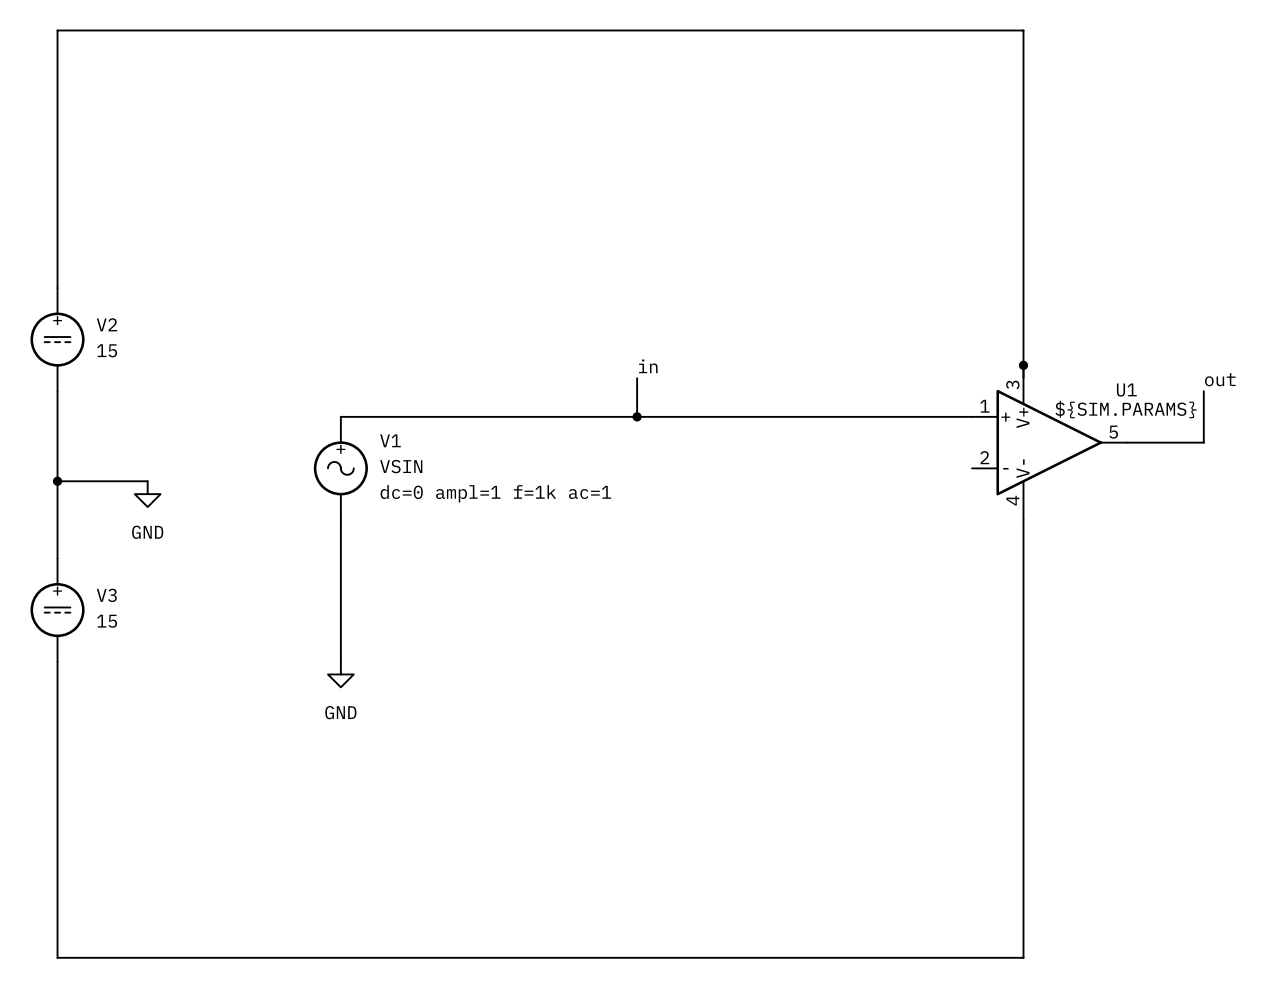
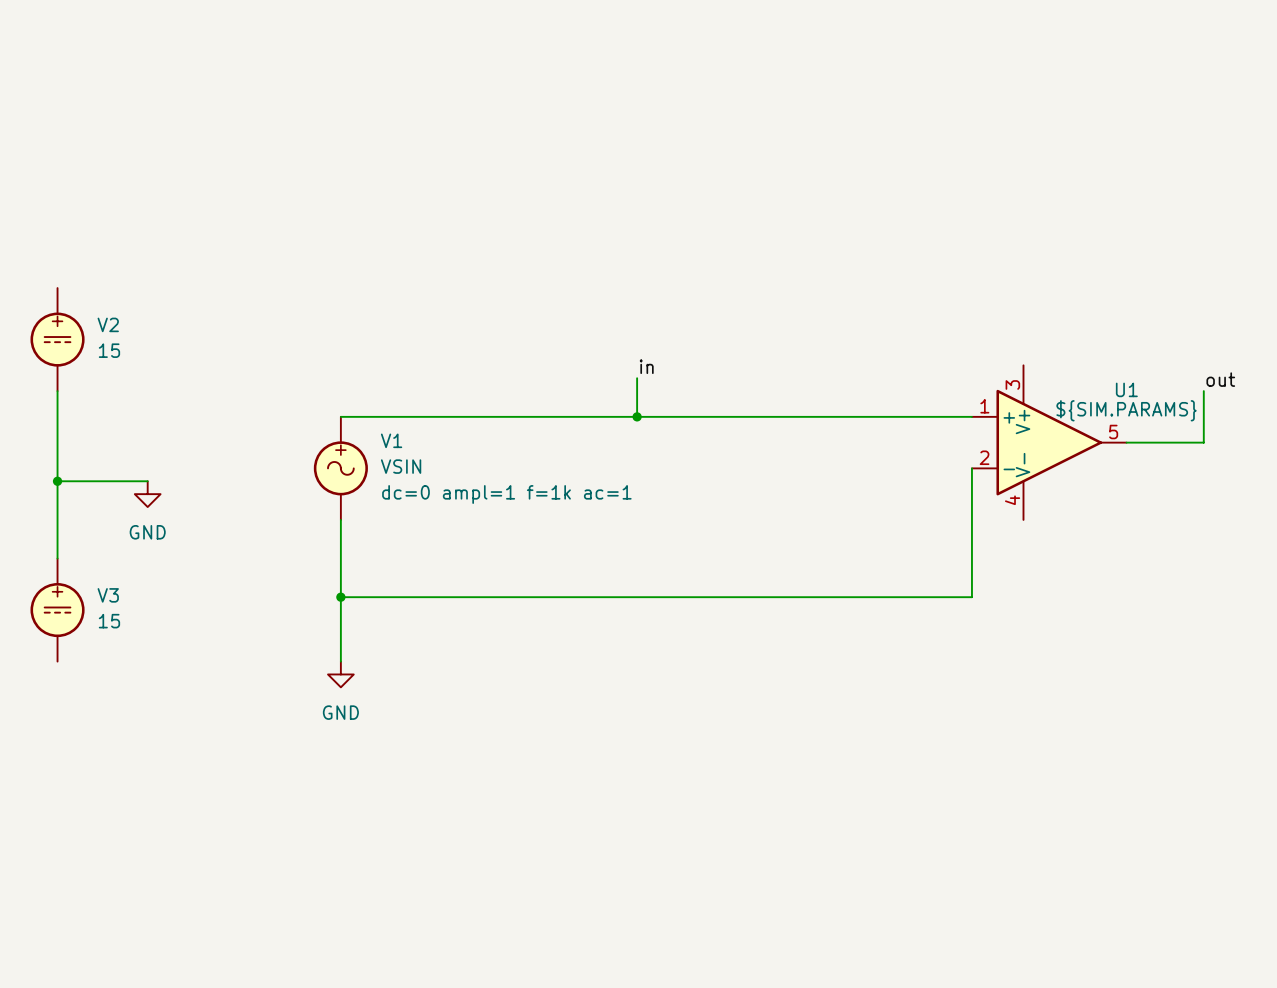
wire: (57, 288) (57, 30) (1023, 30) (1023, 378) -> none
junction: (1023, 365) -> none
wire: none -> (971, 468) (971, 597) (340, 597)
wire: (1023, 519) (1023, 957) (57, 957) (57, 661) -> none
junction: none -> (340, 597)

